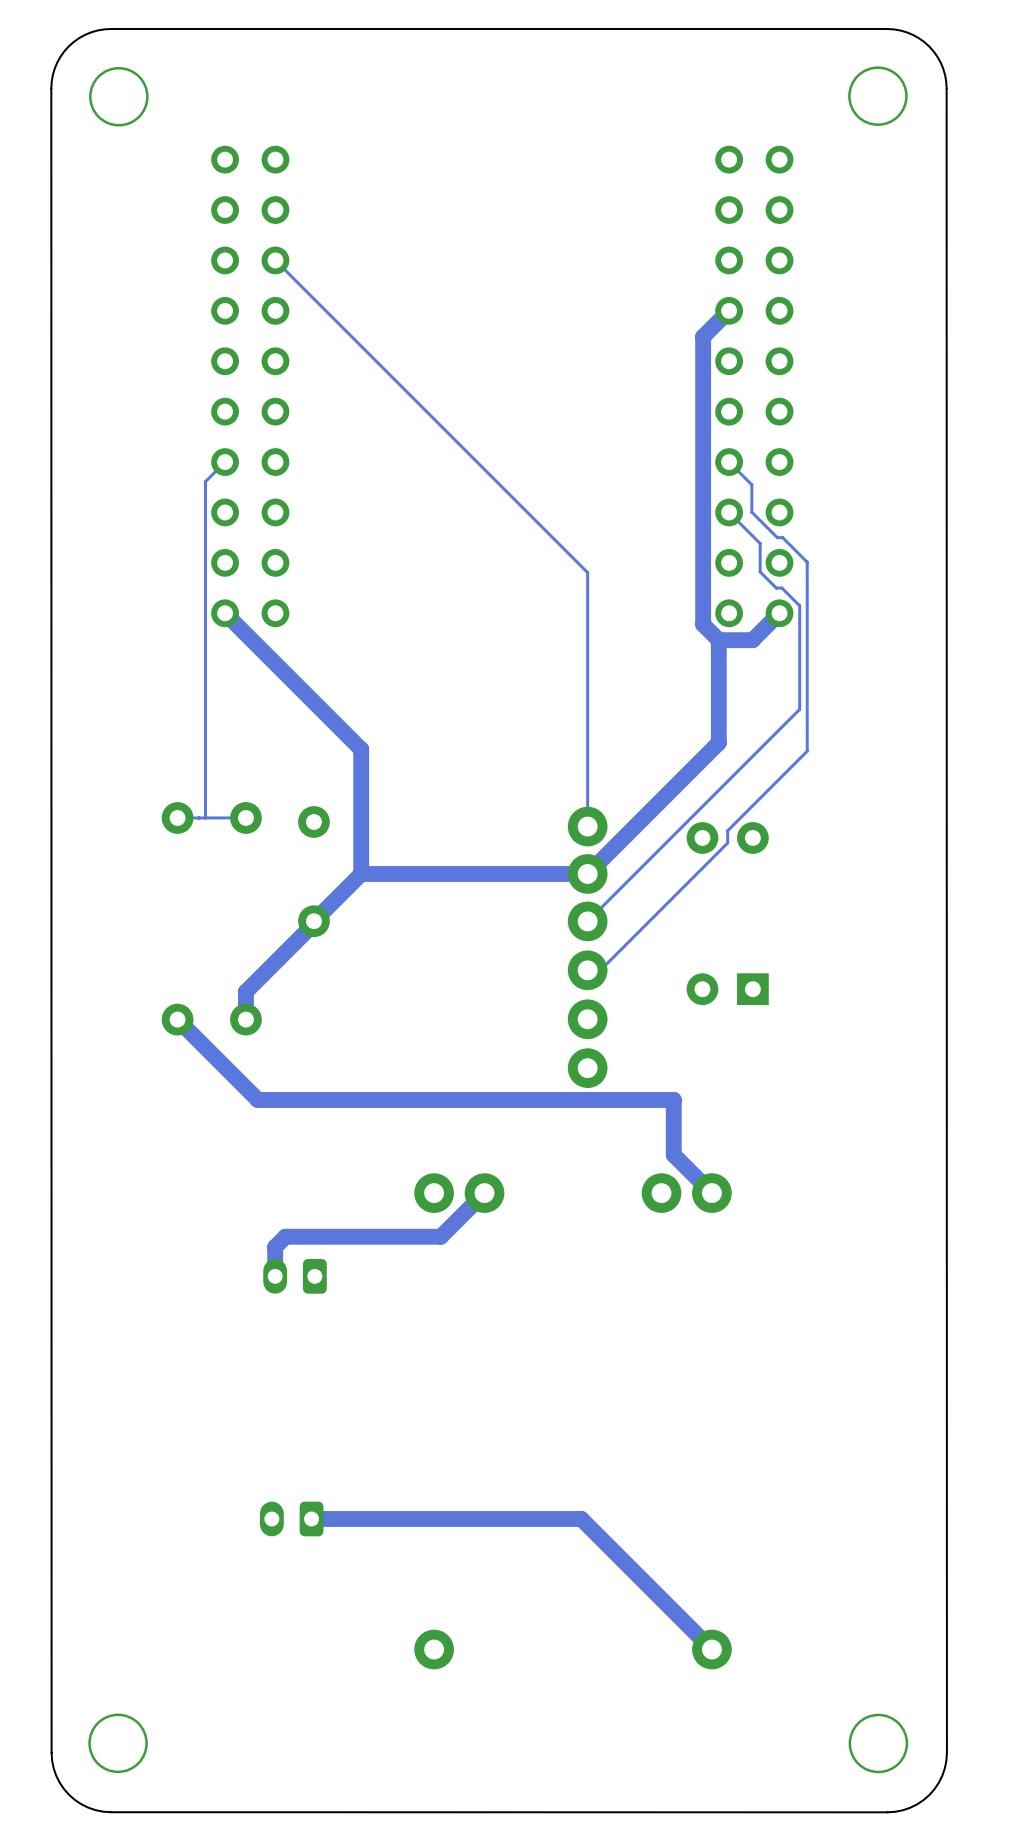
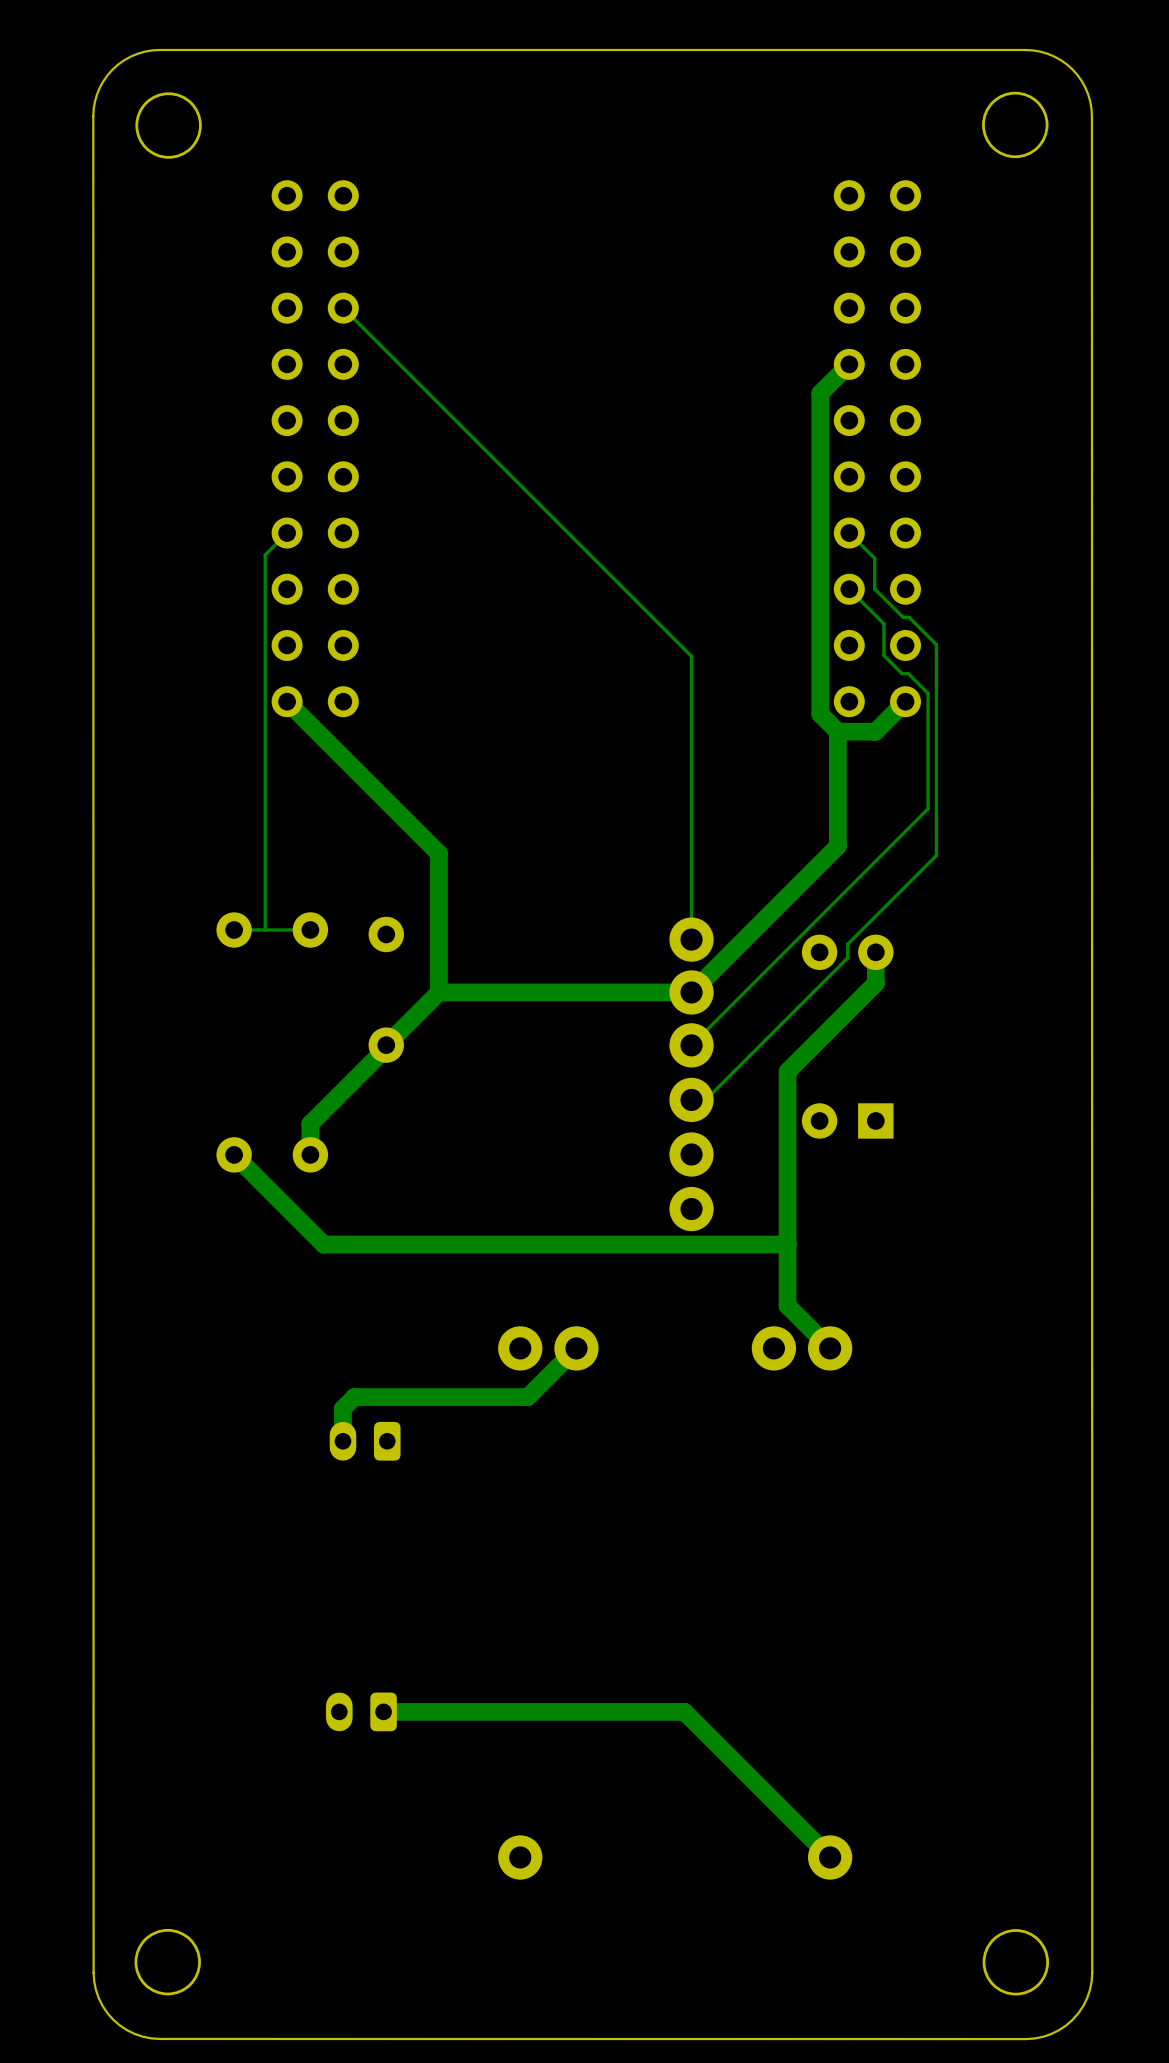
track: none -> (875, 952) (875, 983) (787, 1071) (787, 1244)

